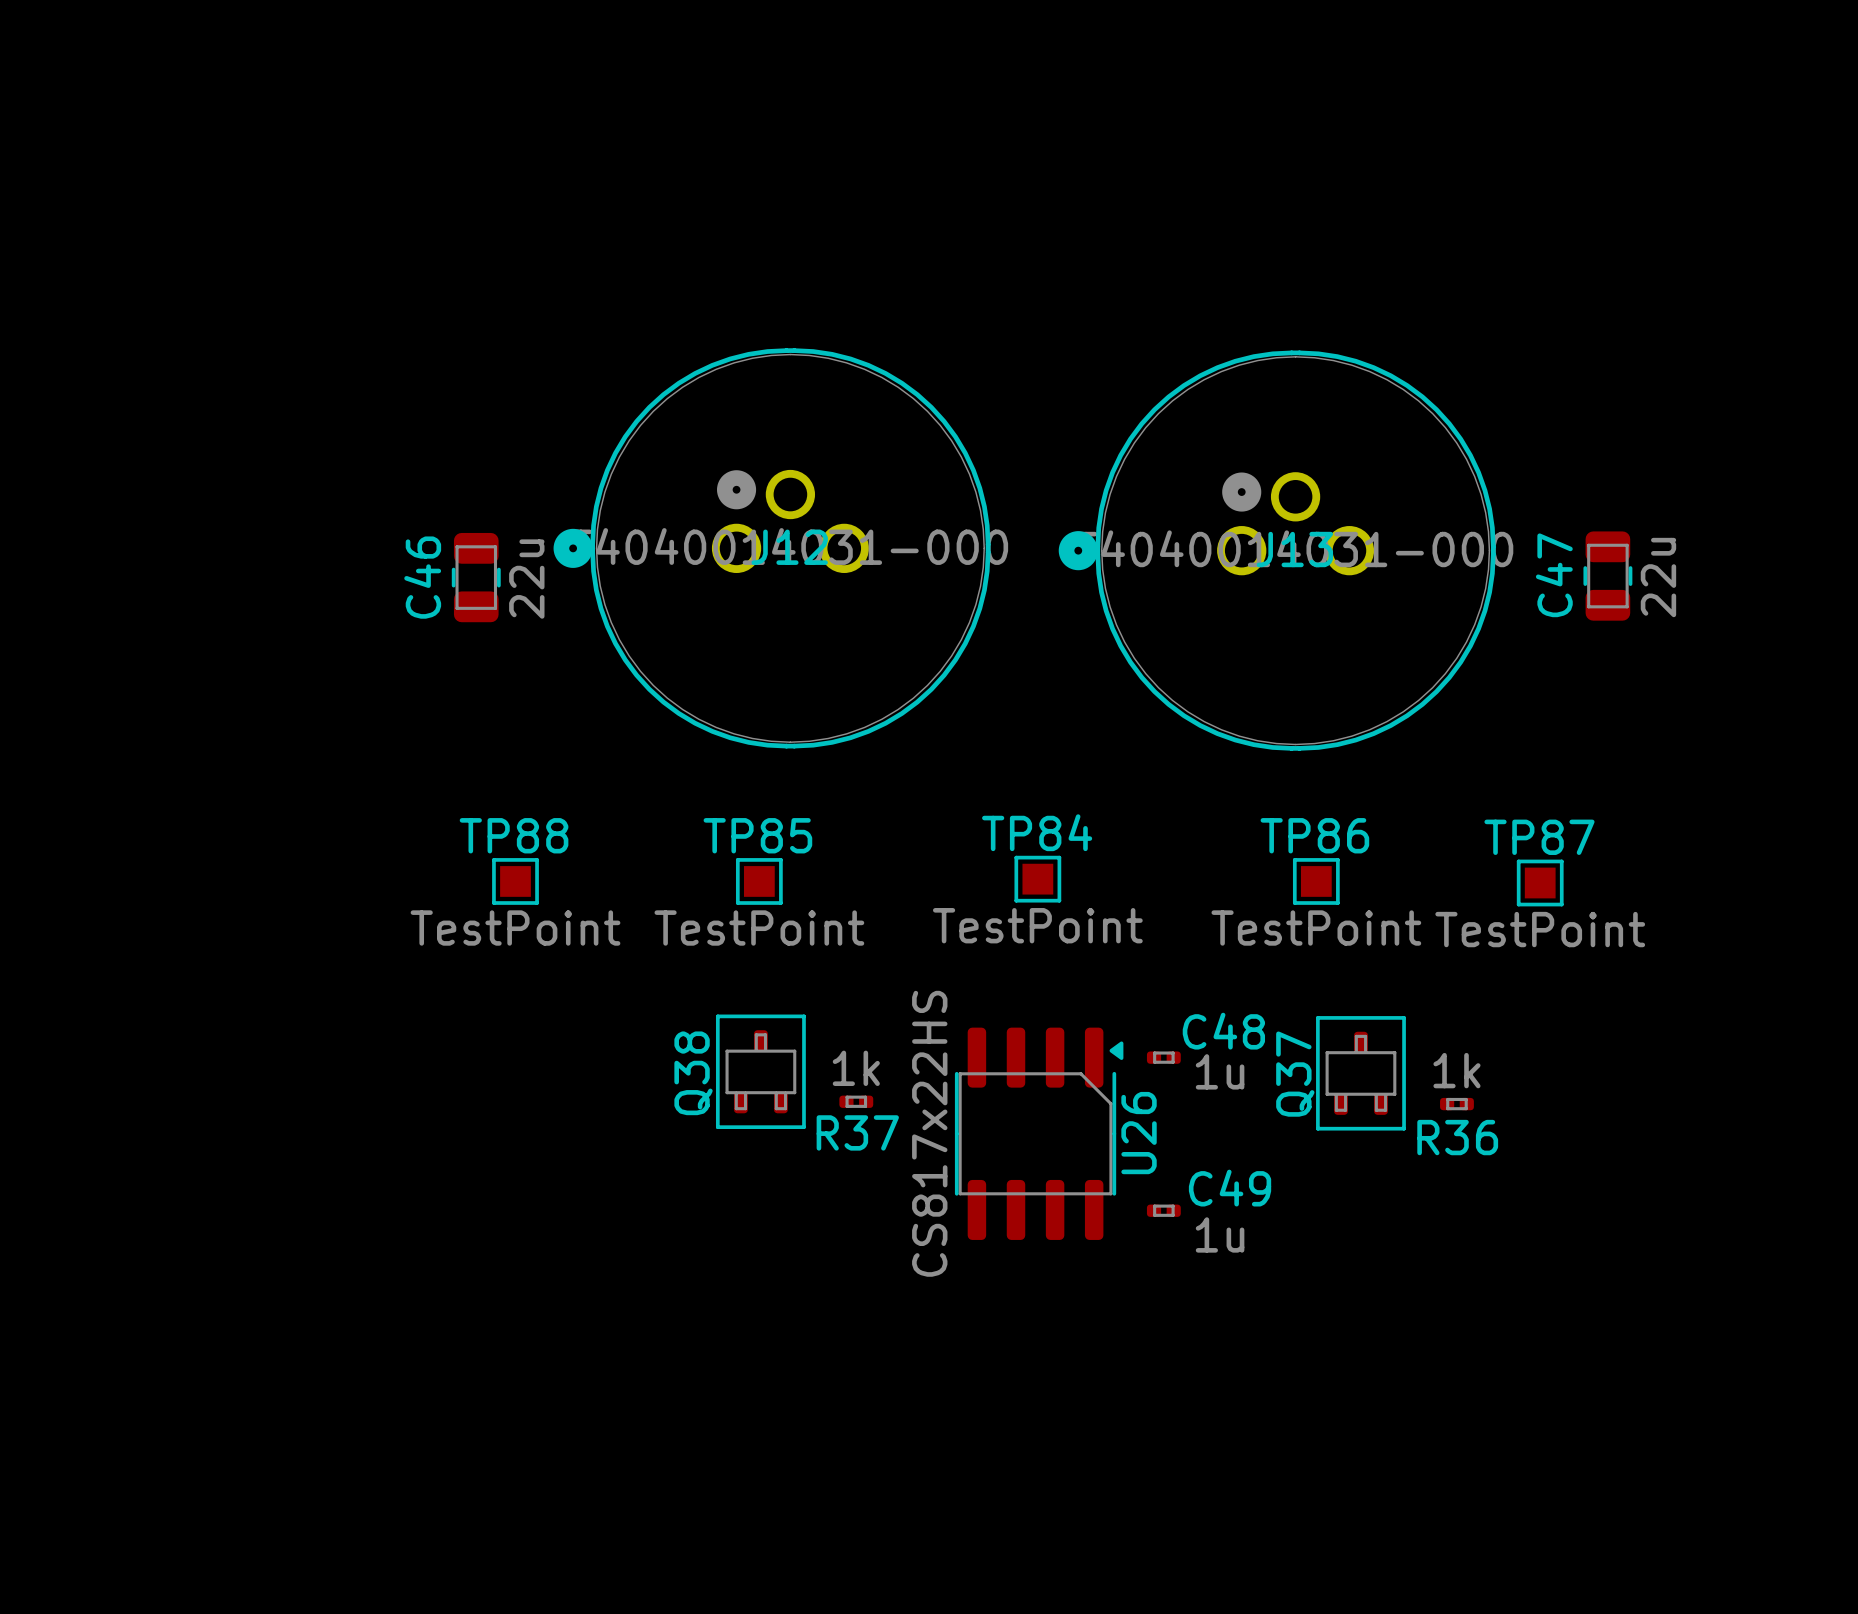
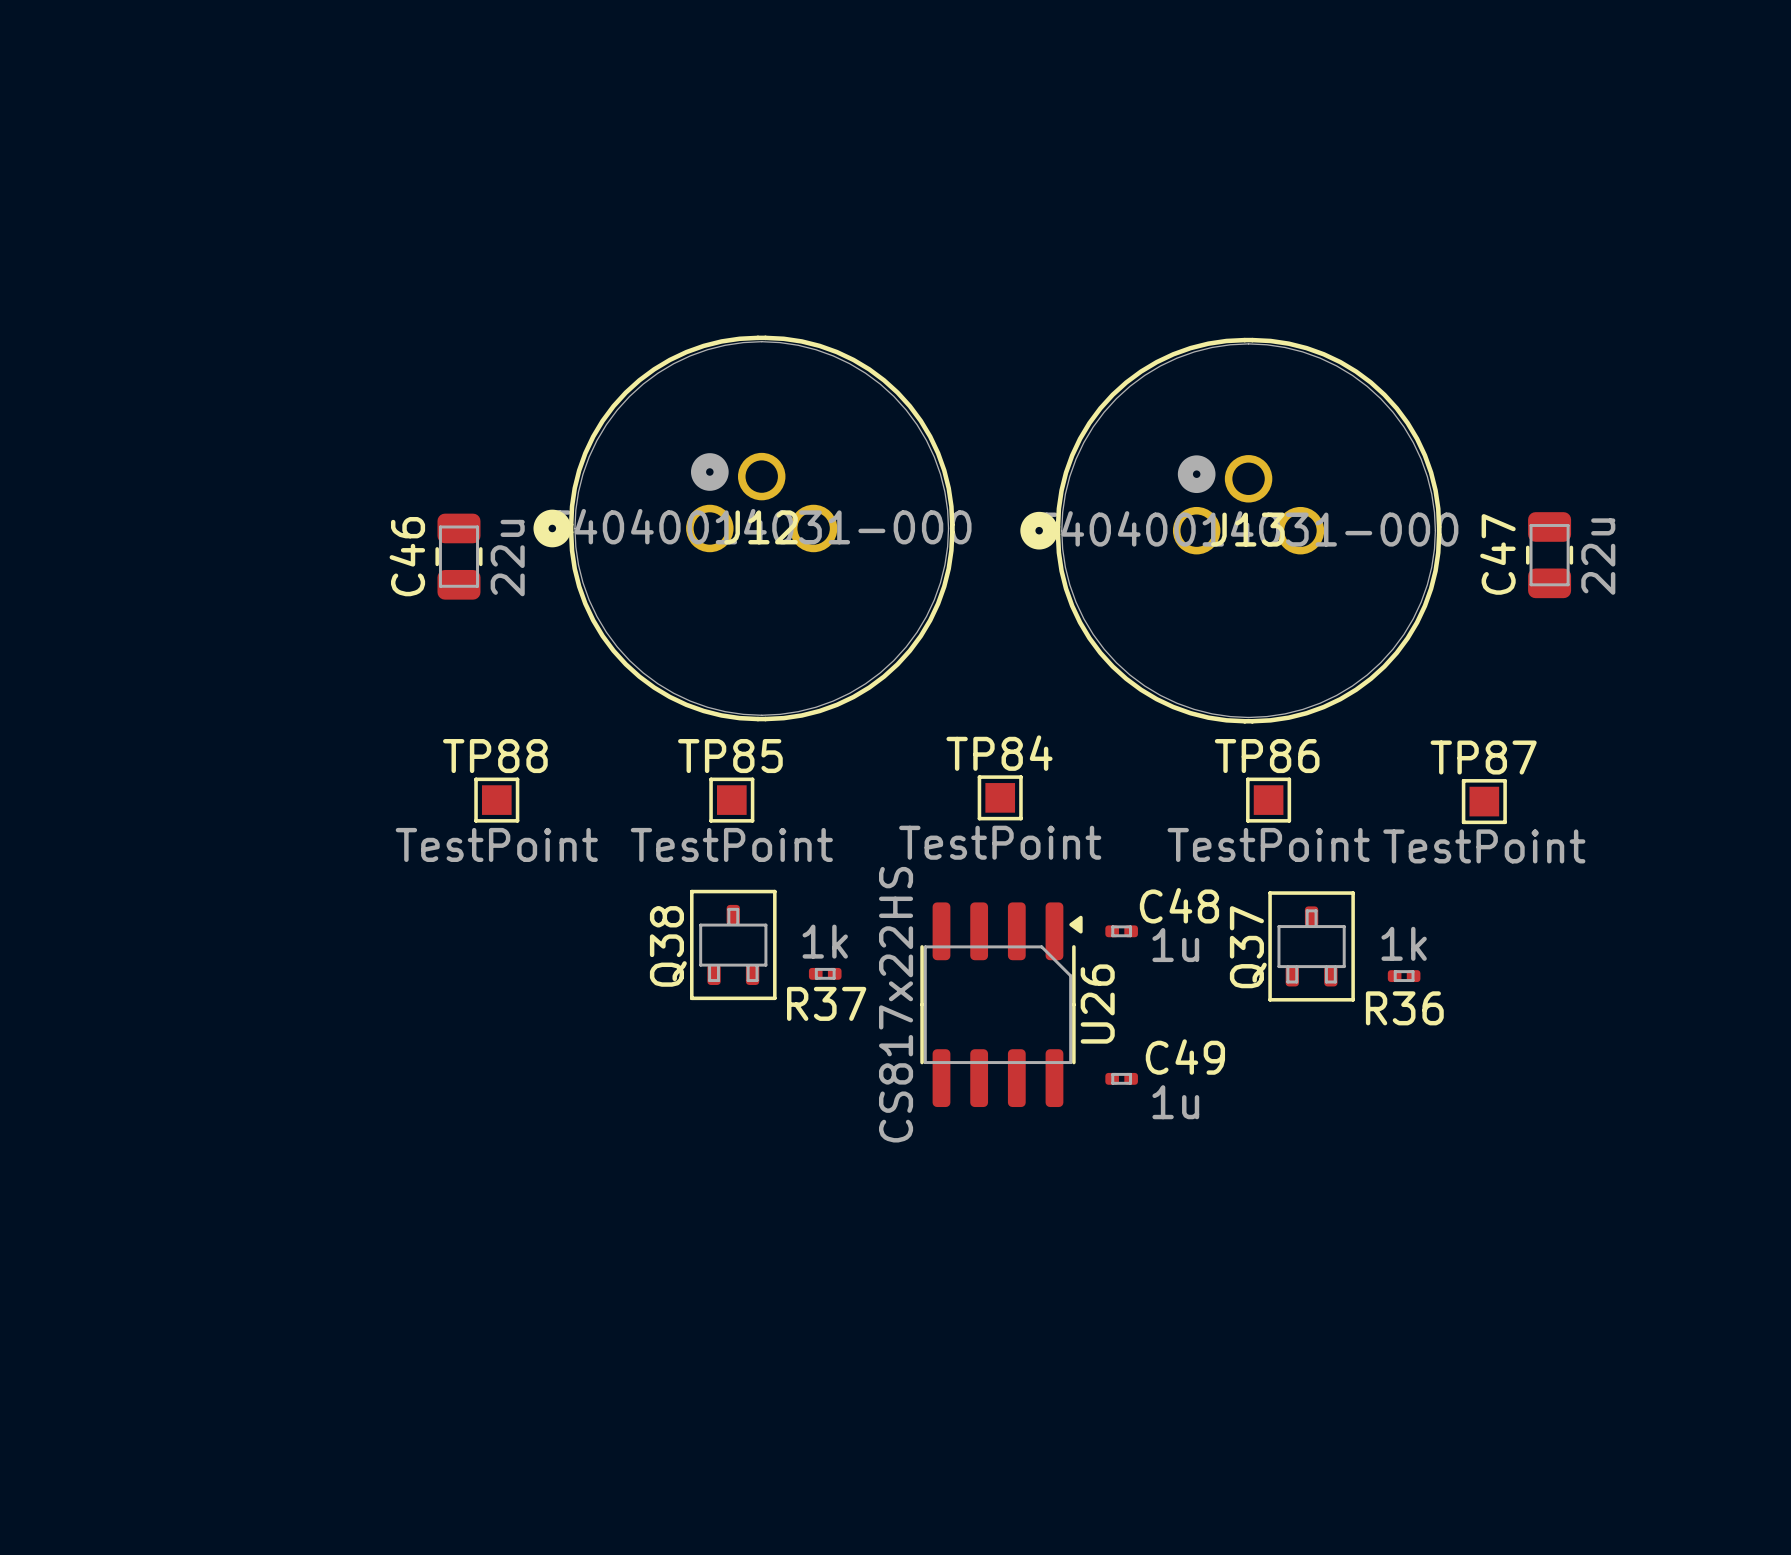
TP84 position: (1037, 879) -> (1000, 797)
TP88 position: (515, 881) -> (496, 800)
TP85 position: (759, 881) -> (731, 800)
TP86 position: (1316, 881) -> (1268, 800)
TP87 position: (1540, 883) -> (1484, 801)
C48 position: (1163, 1057) -> (1121, 931)
Q38 position: (760, 1071) -> (733, 944)
Q37 position: (1360, 1073) -> (1311, 946)
R37 position: (856, 1101) -> (825, 973)
R36 position: (1456, 1104) -> (1404, 976)
U26 position: (1039, 1133) -> (1001, 1004)
C49 position: (1163, 1210) -> (1121, 1078)

